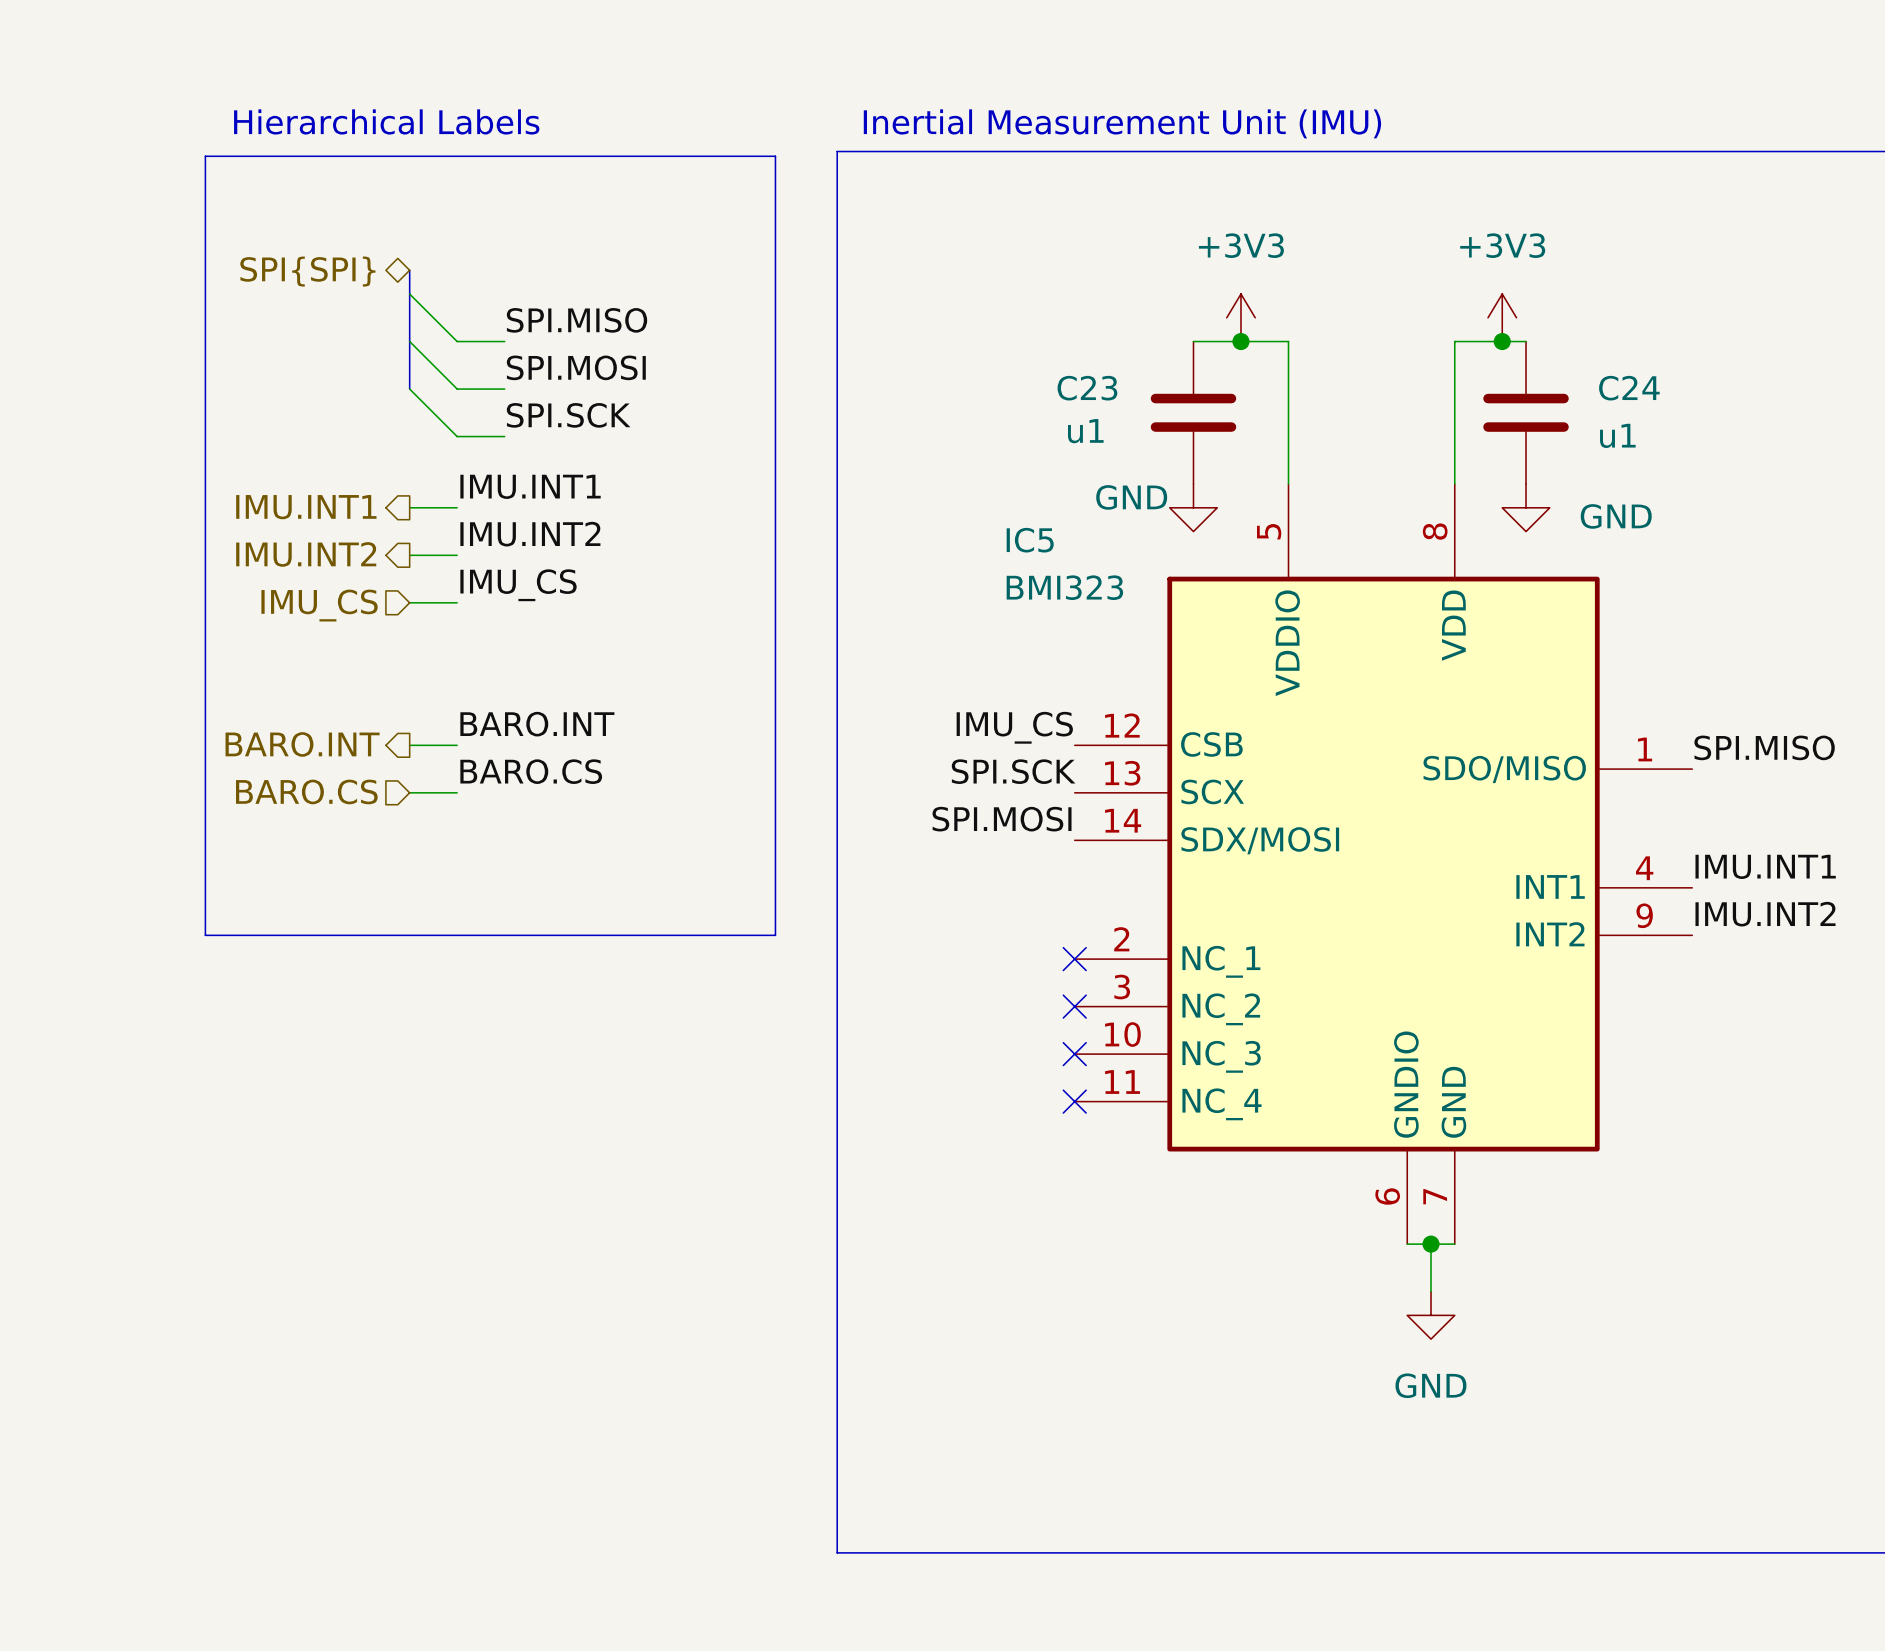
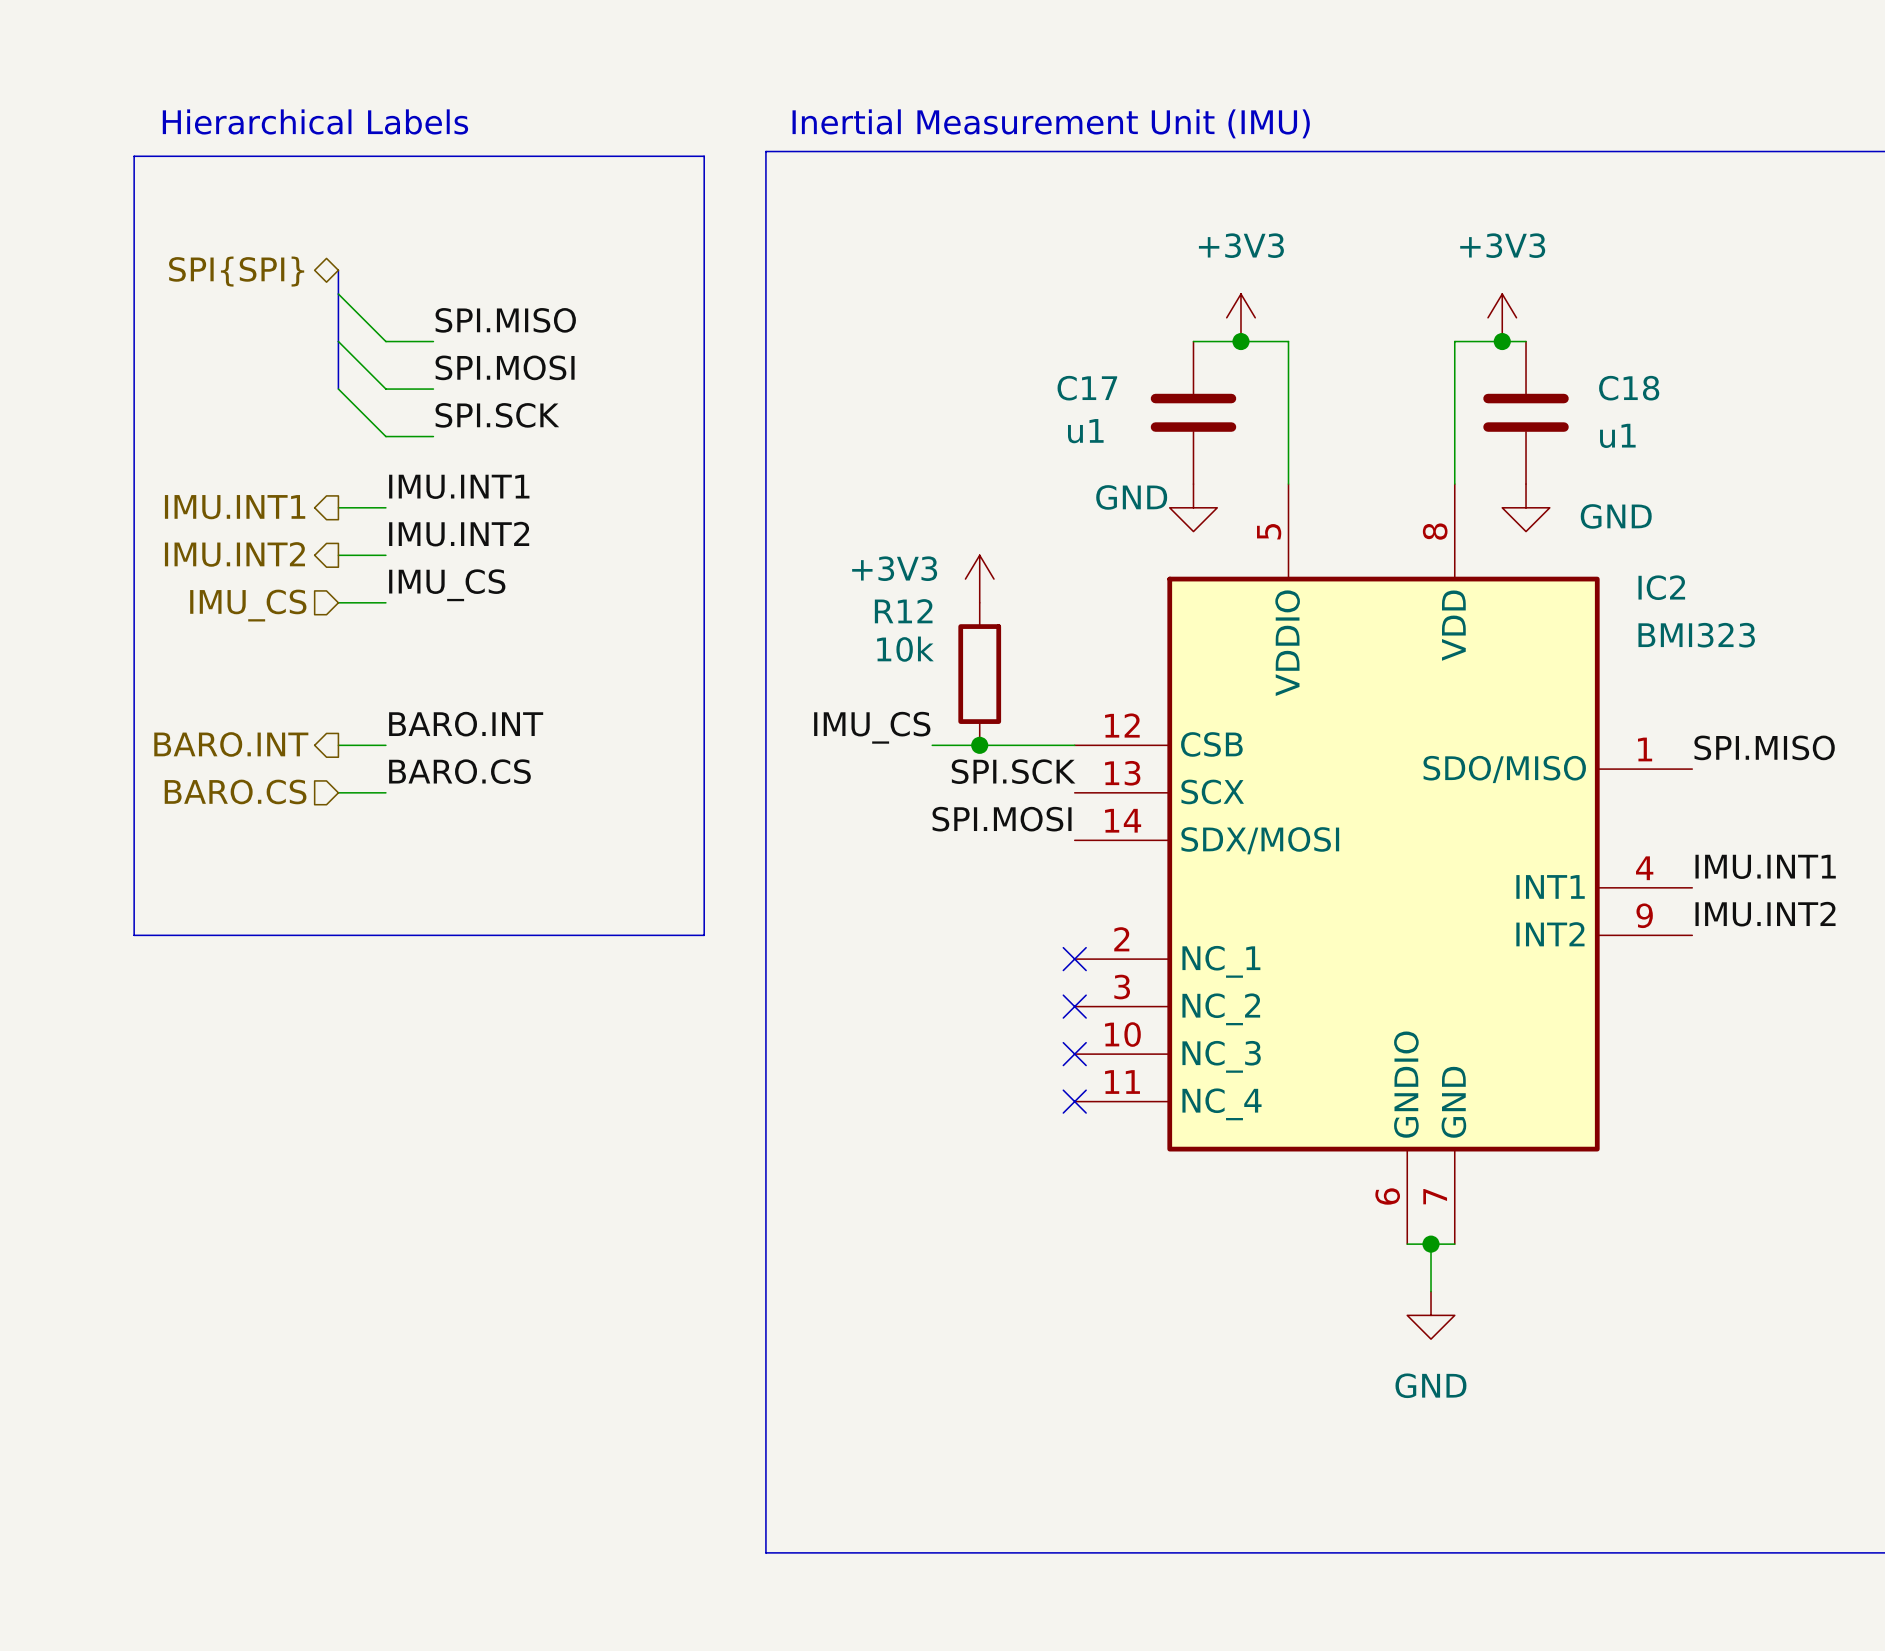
text position: Hierarchical Labels (386, 121) -> Hierarchical Labels (315, 121)
text position: Inertial Measurement Unit (IMU) (1122, 123) -> Inertial Measurement Unit (IMU) (1051, 123)
line: (837, 151) (837, 1552) -> (837, 151) (765, 151) (765, 1552) (837, 1552)
line: (205, 156) (205, 935) -> (205, 156) (134, 156) (134, 935) (205, 935)
line: (704, 156) (775, 156) (775, 935) (704, 935) -> (704, 156) (704, 935)
bus: (409, 270) (409, 389) -> (338, 270) (338, 389)
hierarchical label position: SPI{SPI} (307, 271) -> SPI{SPI} (236, 271)
wire: (409, 294) (457, 341) (504, 341) -> (338, 294) (385, 341) (433, 341)
label position: SPI.MISO (577, 320) -> SPI.MISO (505, 320)
wire: (409, 341) (457, 389) (504, 389) -> (338, 341) (385, 389) (433, 389)
label position: SPI.MOSI (576, 367) -> SPI.MOSI (505, 367)
C23 name: C23 (1087, 388) -> C17 (1087, 388)
C24 name: C24 (1629, 388) -> C18 (1629, 388)
wire: (409, 389) (457, 436) (504, 436) -> (338, 389) (385, 436) (433, 436)
label position: SPI.SCK (568, 415) -> SPI.SCK (497, 415)
label position: IMU.INT1 (530, 486) -> IMU.INT1 (459, 486)
hierarchical label position: IMU.INT1 (306, 507) -> IMU.INT1 (235, 507)
wire: (409, 507) (457, 507) -> (338, 507) (385, 507)
label position: IMU.INT2 (530, 534) -> IMU.INT2 (459, 534)
IC5 name: IC5 (1030, 540) -> IC2 (1661, 587)
hierarchical label position: IMU.INT2 (306, 554) -> IMU.INT2 (234, 554)
wire: (409, 555) (457, 555) -> (338, 555) (385, 555)
power symbol: none -> +3V3 (979, 579)
label position: IMU_CS (518, 585) -> IMU_CS (447, 585)
IC5 value position: BMI323 (1064, 587) -> BMI323 (1696, 635)
wire: (409, 602) (457, 602) -> (338, 602) (385, 602)
hierarchical label position: IMU_CS (319, 605) -> IMU_CS (248, 605)
R12: none -> 10k (979, 674)
label position: BARO.INT (537, 724) -> BARO.INT (466, 724)
label position: IMU_CS (1014, 727) -> IMU_CS (872, 727)
hierarchical label position: BARO.INT (302, 744) -> BARO.INT (231, 744)
wire: (409, 745) (457, 745) -> (338, 745) (385, 745)
wire: none -> (932, 745) (1074, 745)
junction: none -> (979, 745)
label position: BARO.CS (531, 771) -> BARO.CS (459, 771)
hierarchical label position: BARO.CS (306, 791) -> BARO.CS (235, 791)
wire: (409, 792) (457, 792) -> (338, 792) (385, 792)

